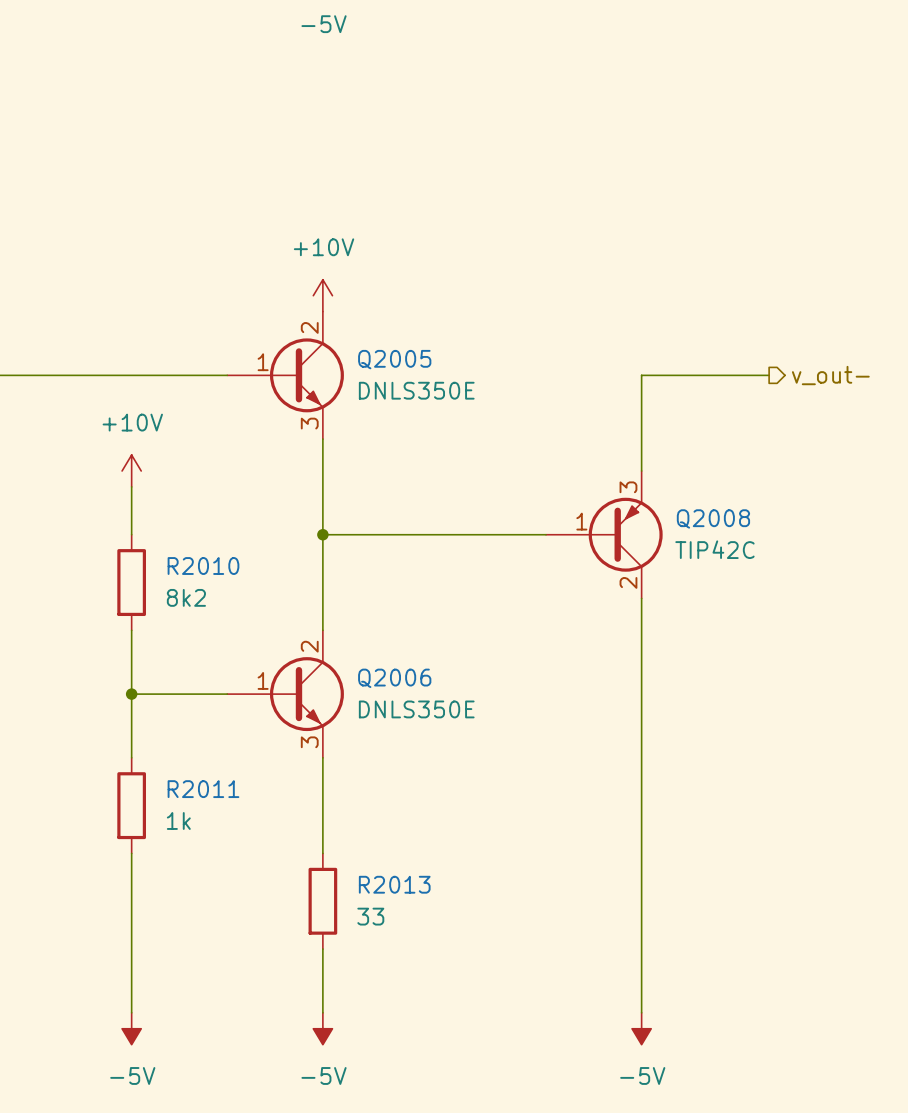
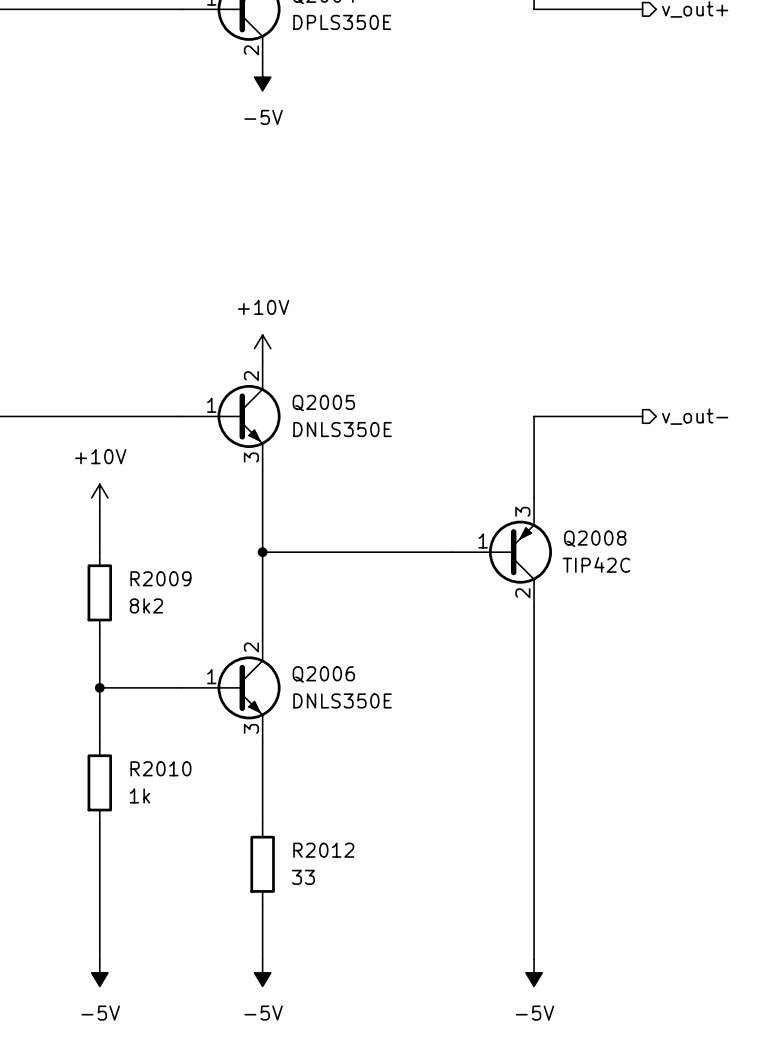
R2010 name: R2010 (203, 566) -> R2009 (160, 578)
R2011 name: R2011 (203, 789) -> R2010 (160, 768)
R2013 name: R2013 (394, 884) -> R2012 (323, 850)

